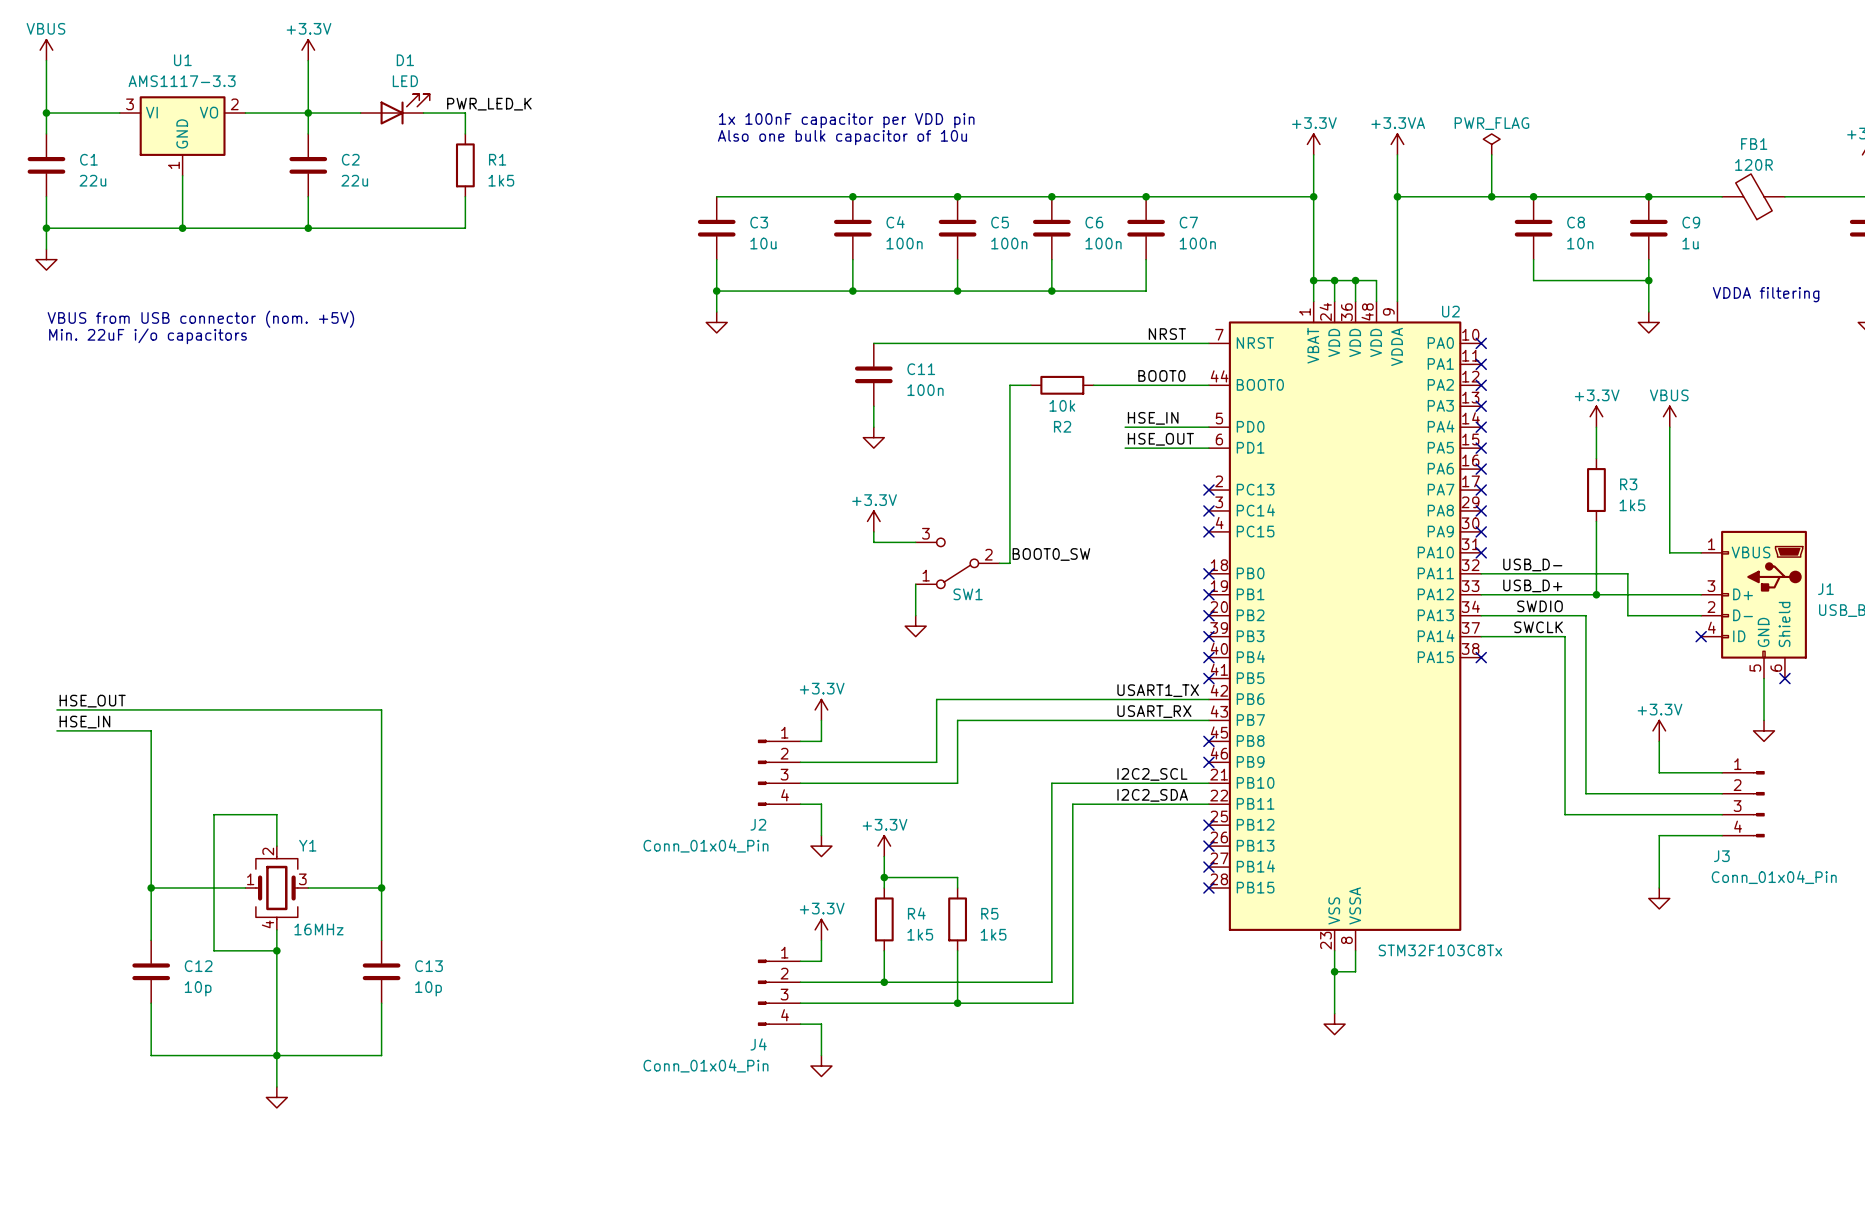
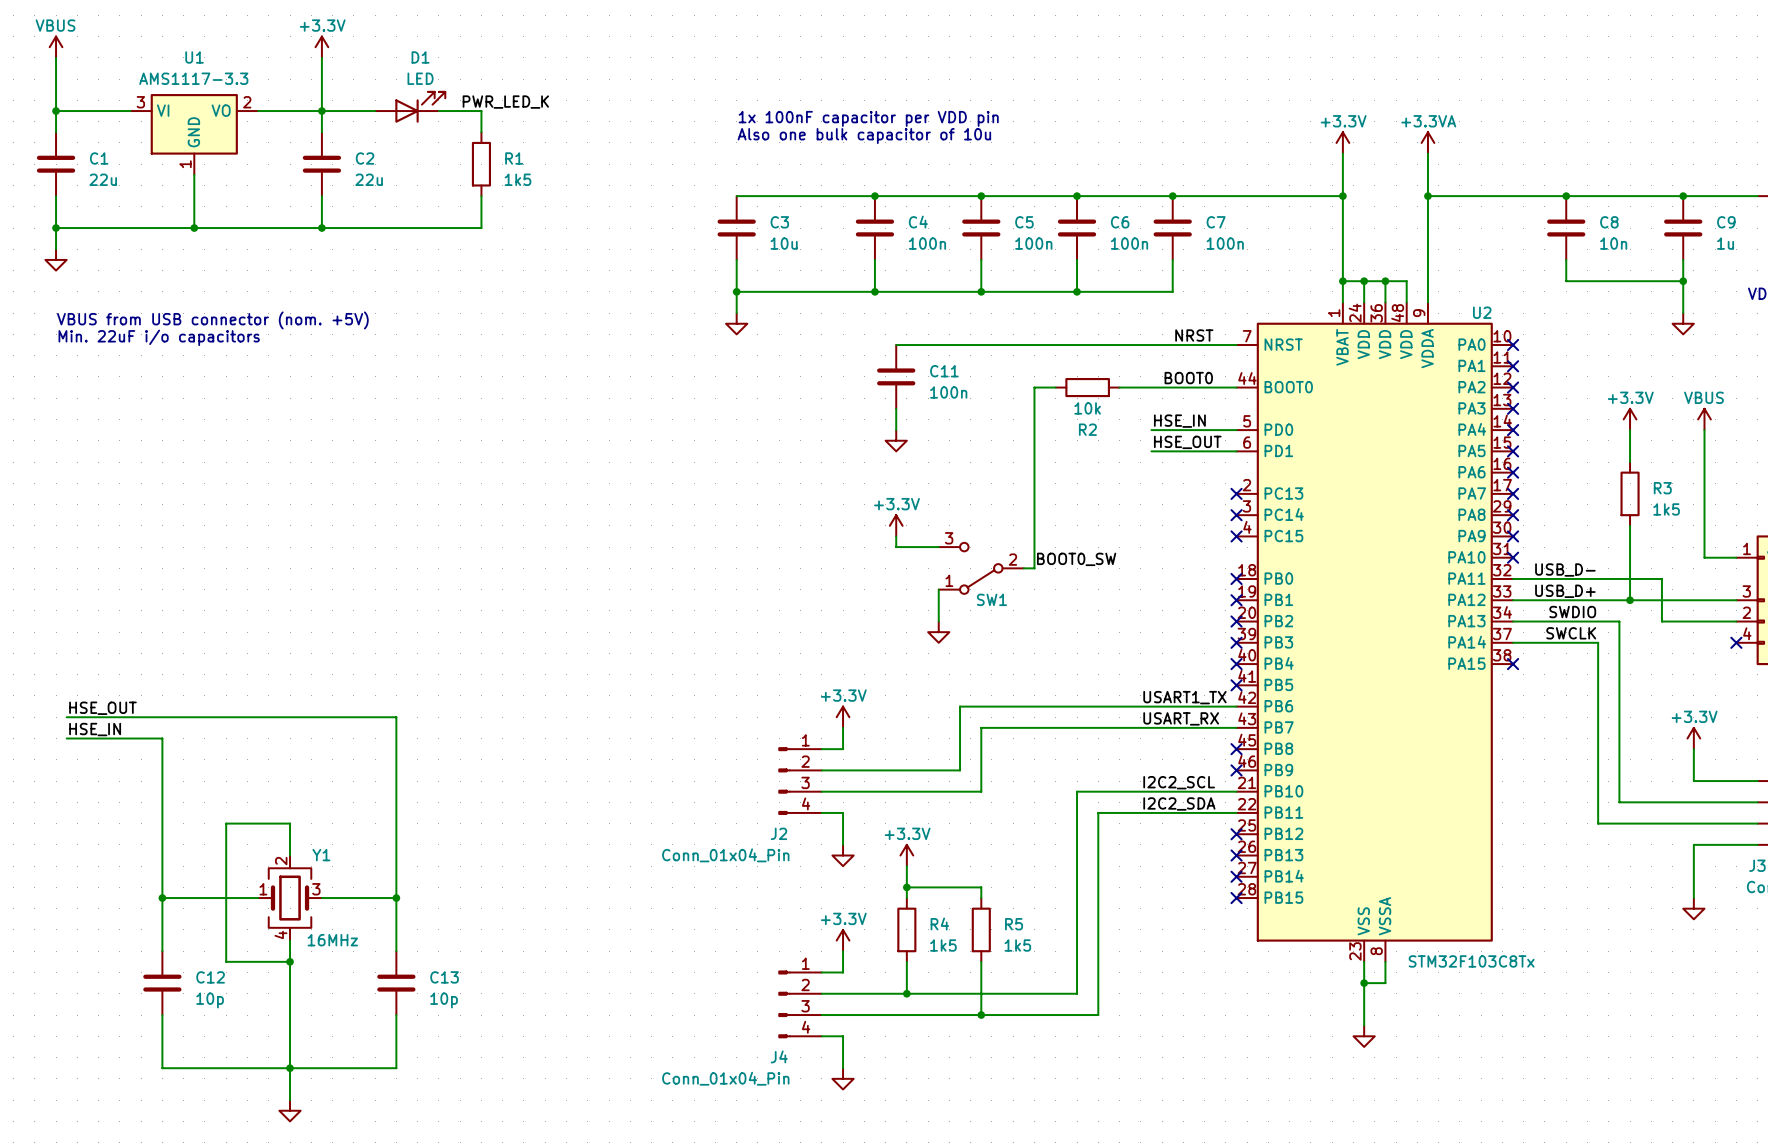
power symbol: PWR_FLAG (1491, 144) -> none
wire: (1491, 154) (1491, 196) -> none
junction: (1491, 196) -> none

